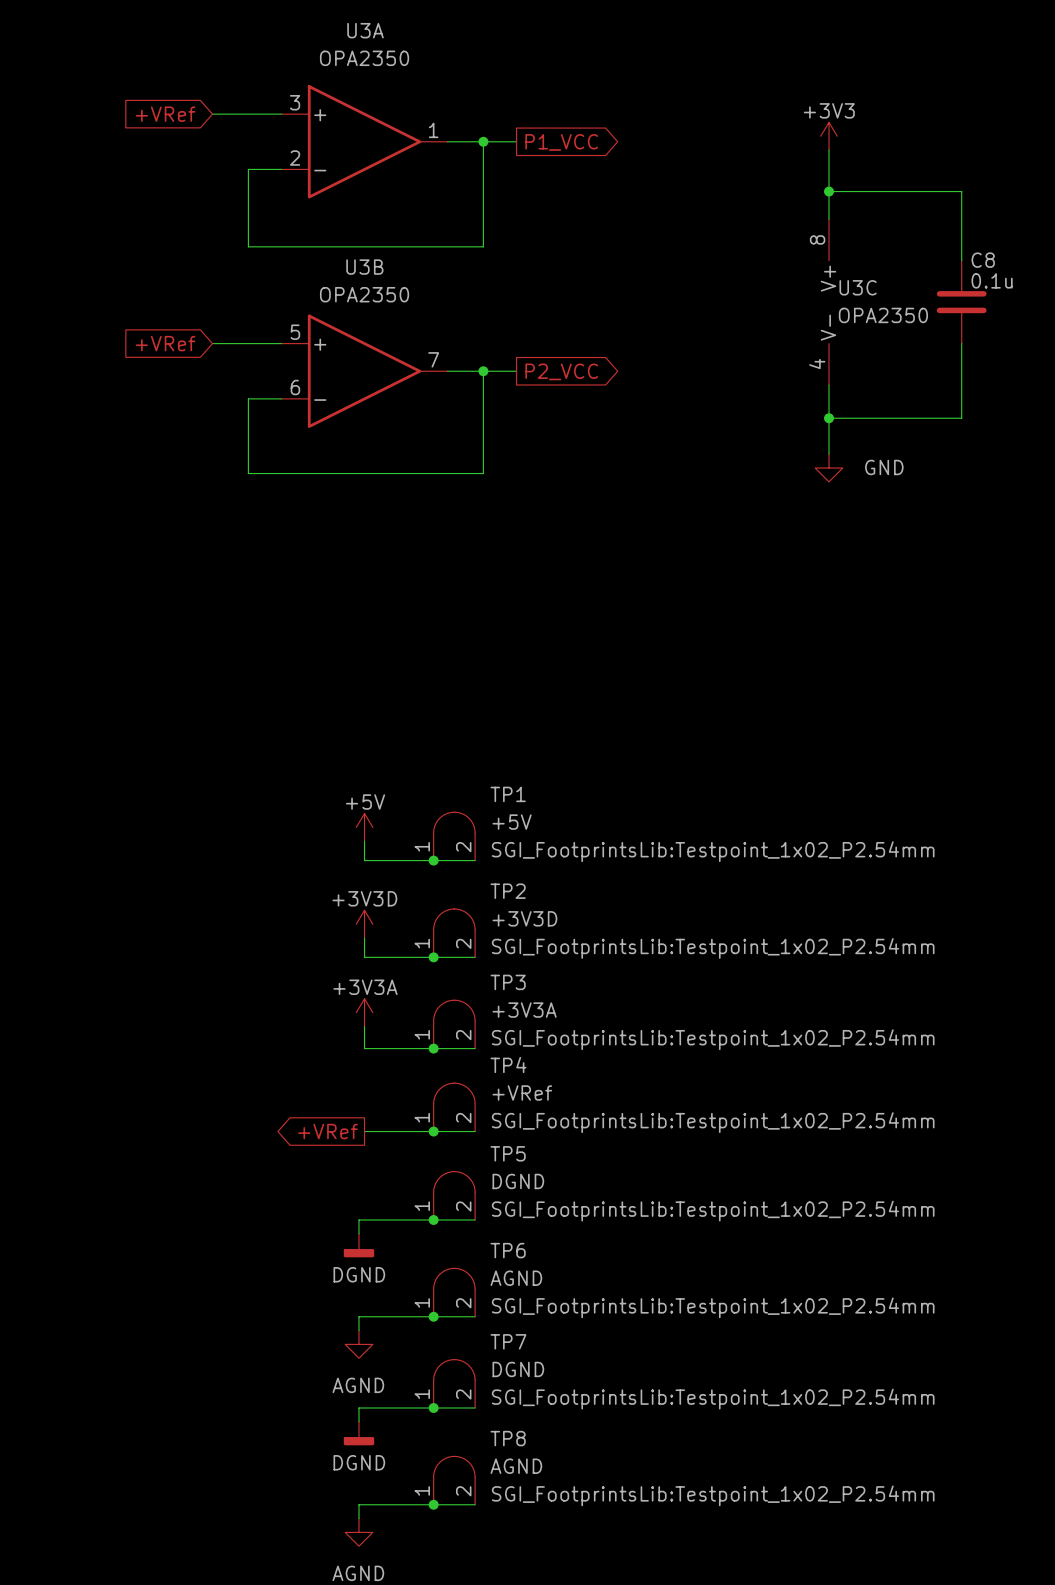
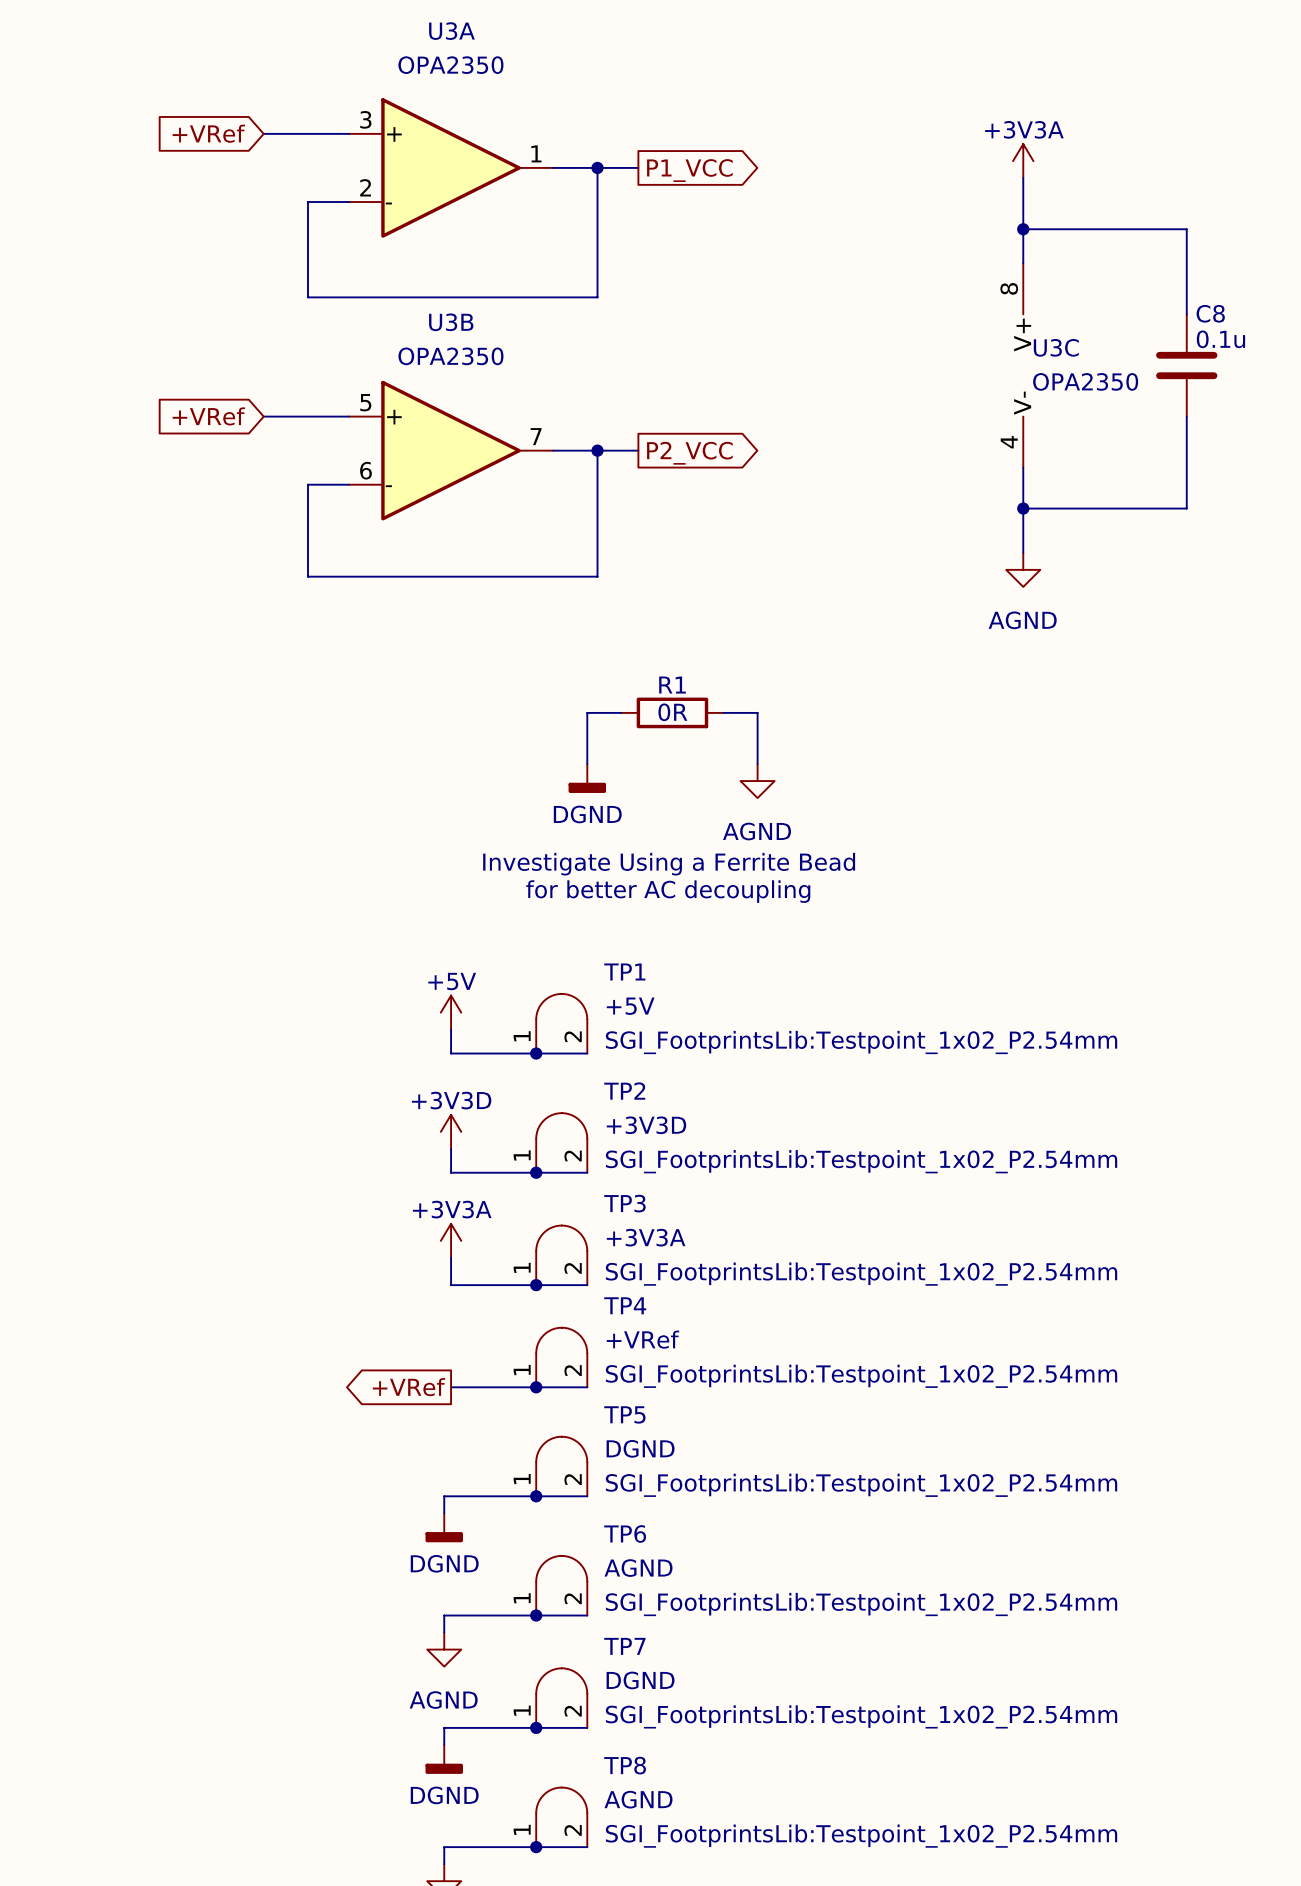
power symbol: +3V3 (828, 136) -> +3V3A (1023, 161)
power symbol: GND (828, 468) -> AGND (1023, 569)
wire: none -> (621, 712) (587, 712) (587, 764)
R1: none -> 0R (672, 712)
wire: none -> (723, 712) (757, 712) (757, 764)
power symbol: none -> DGND (587, 778)
power symbol: none -> AGND (757, 781)
text: none -> Investigate Using a Ferrite Bead (669, 864)
text: none -> for better AC decoupling (668, 891)

